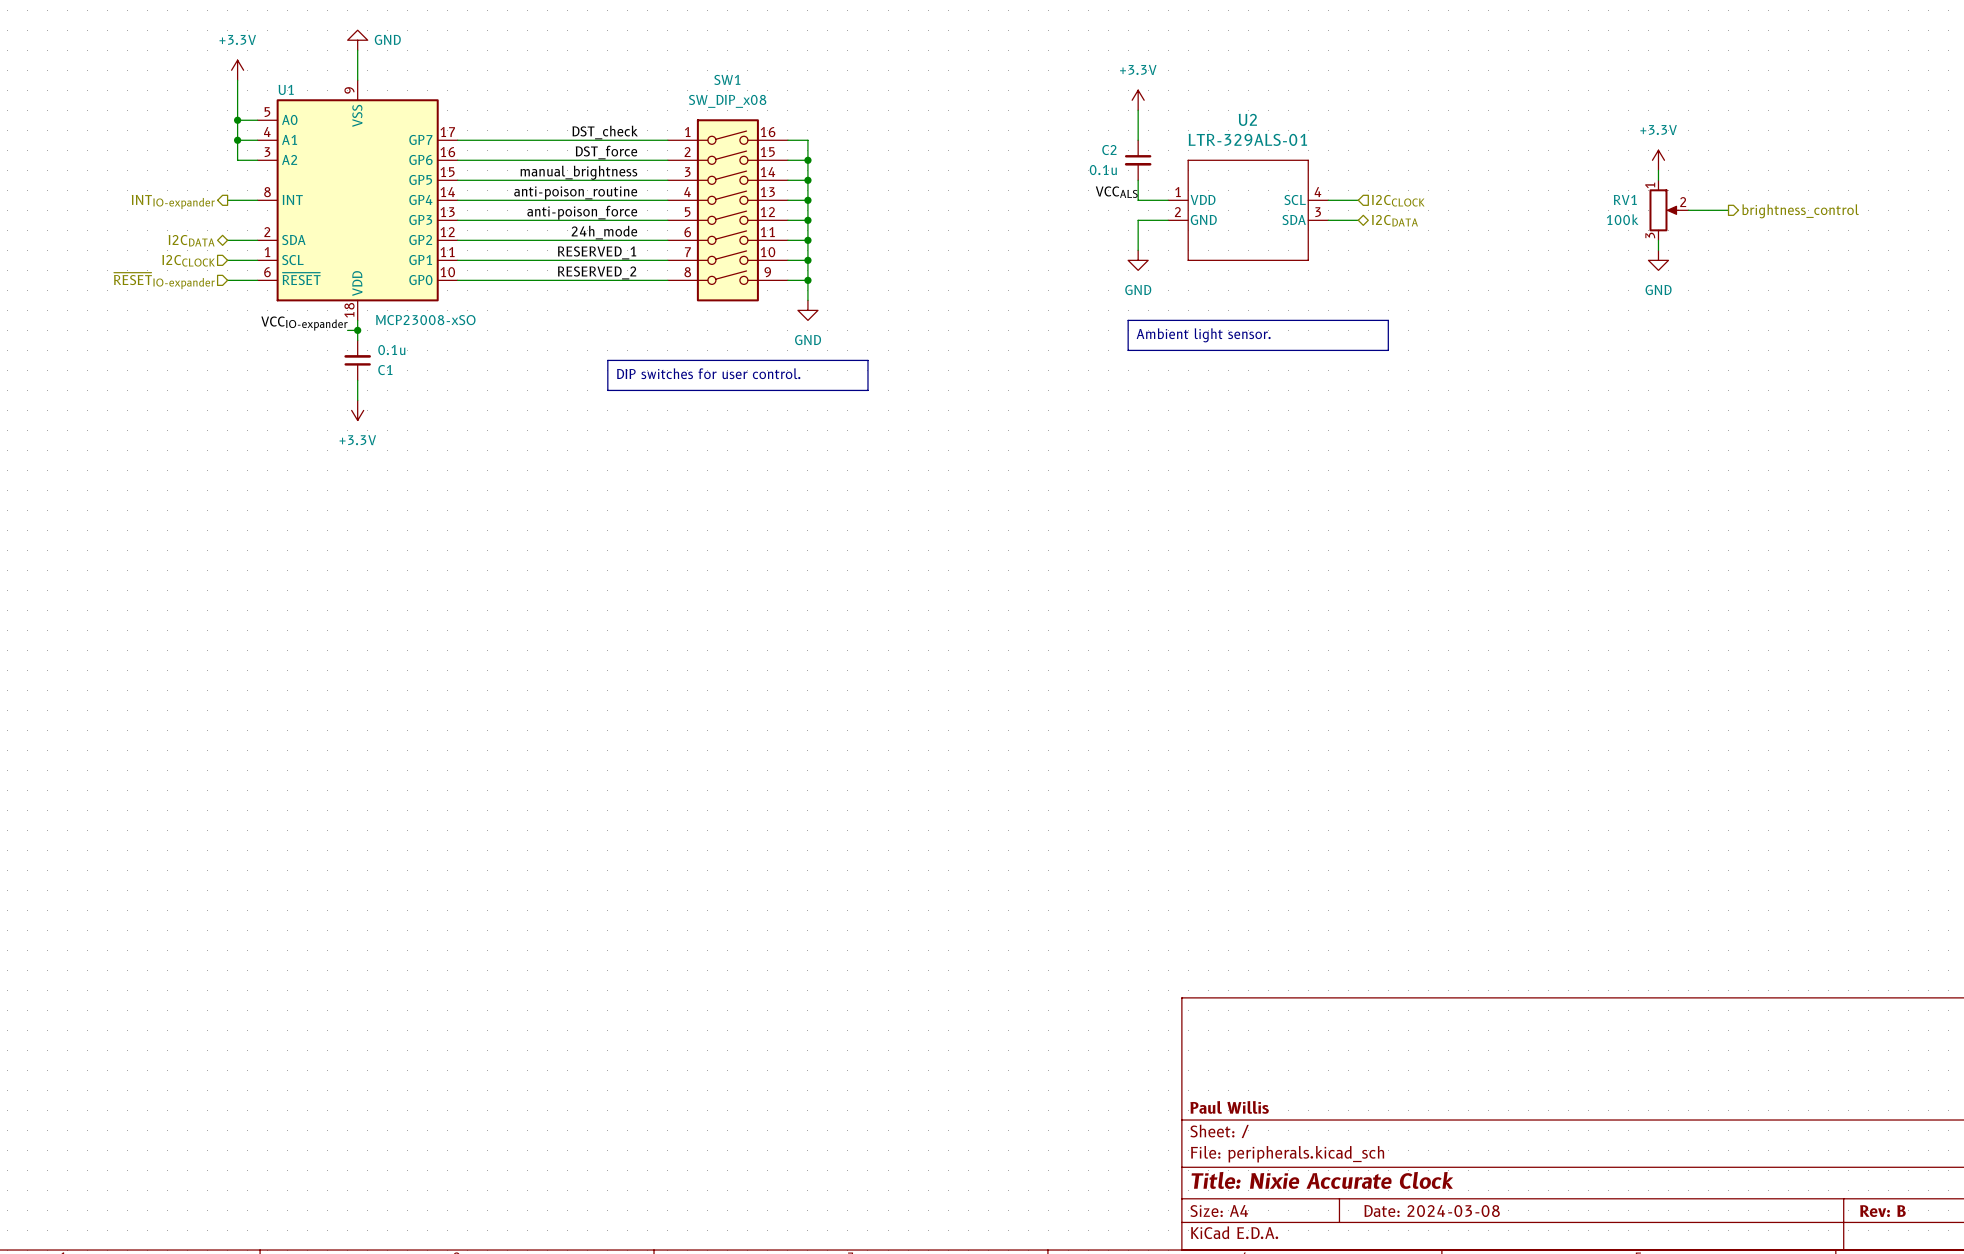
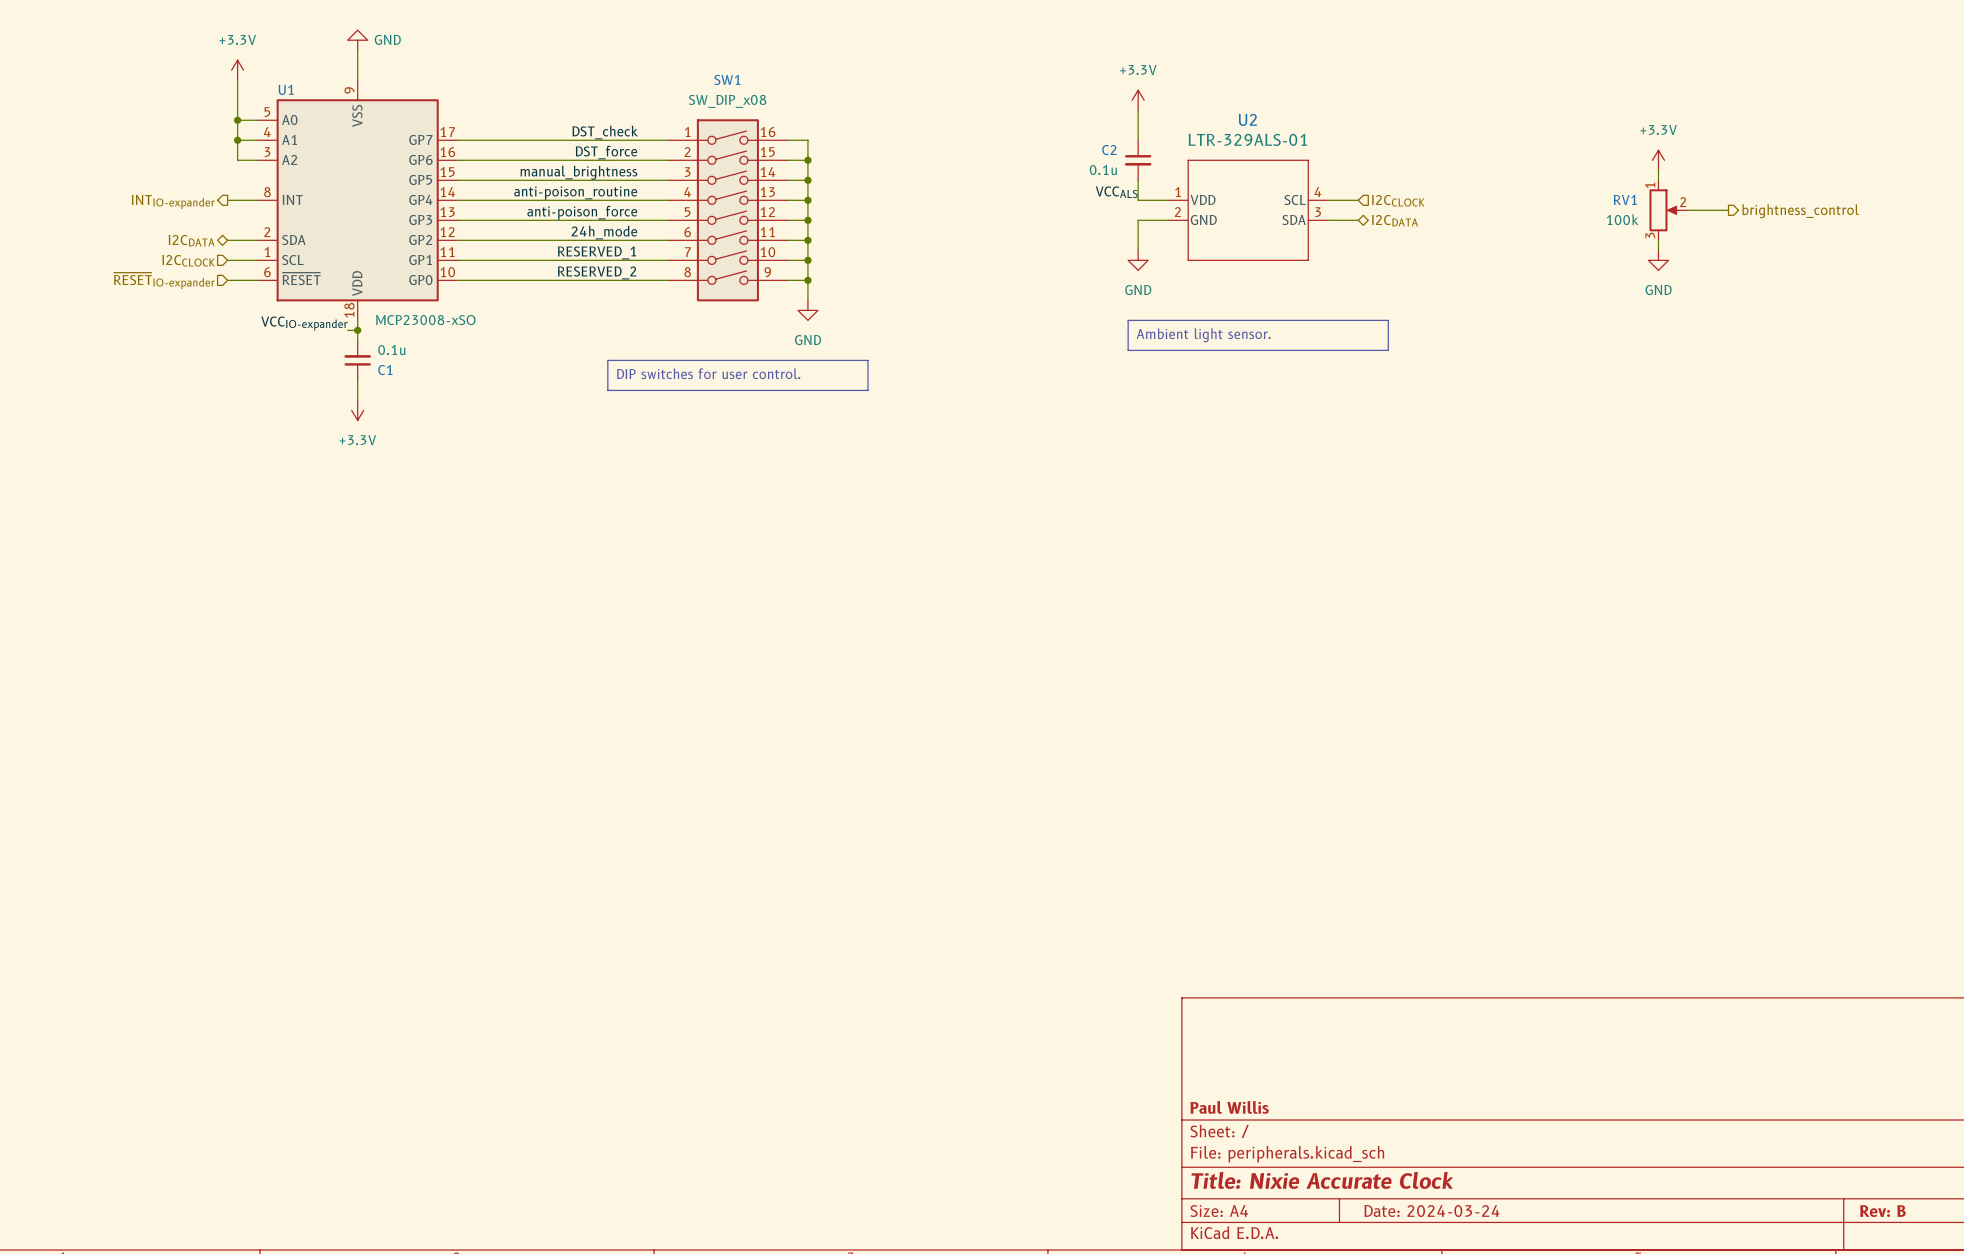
title block: Date: 2024-03-08 (1432, 1211) -> Date: 2024-03-24 (1431, 1211)

